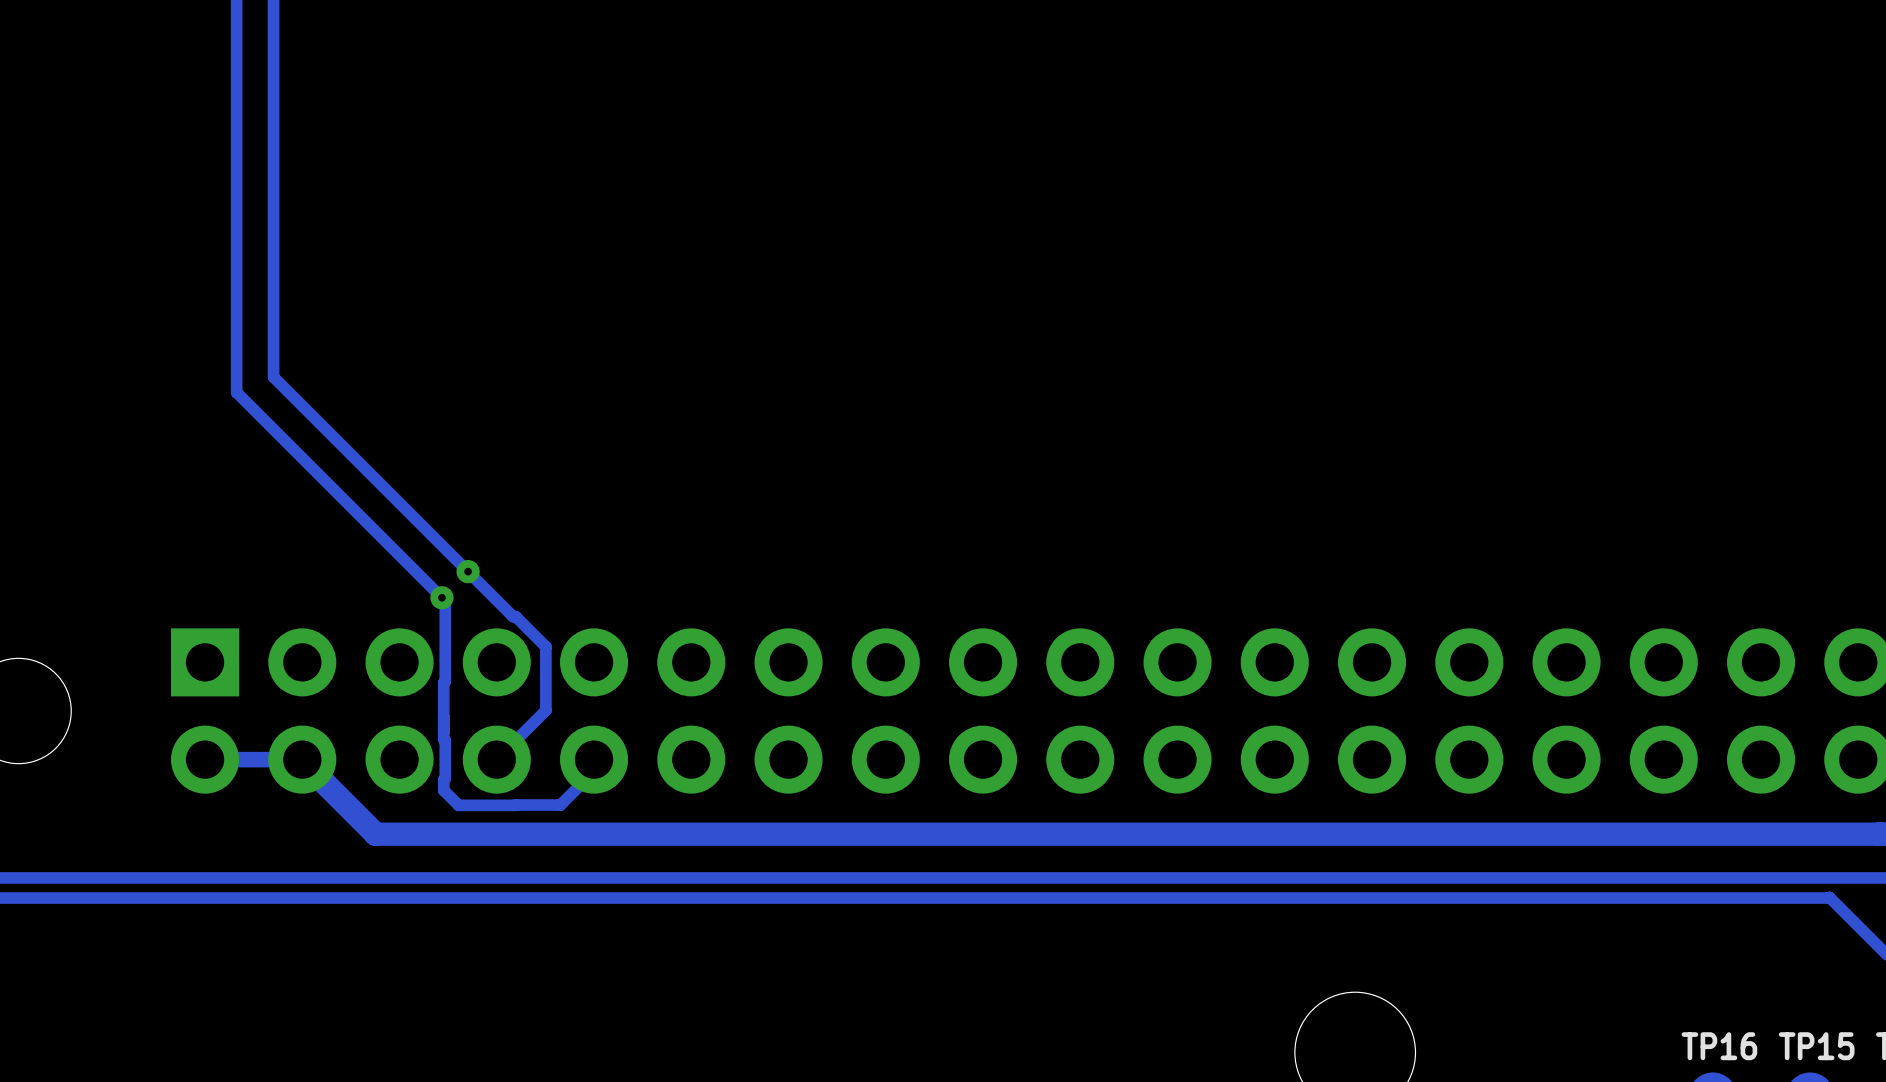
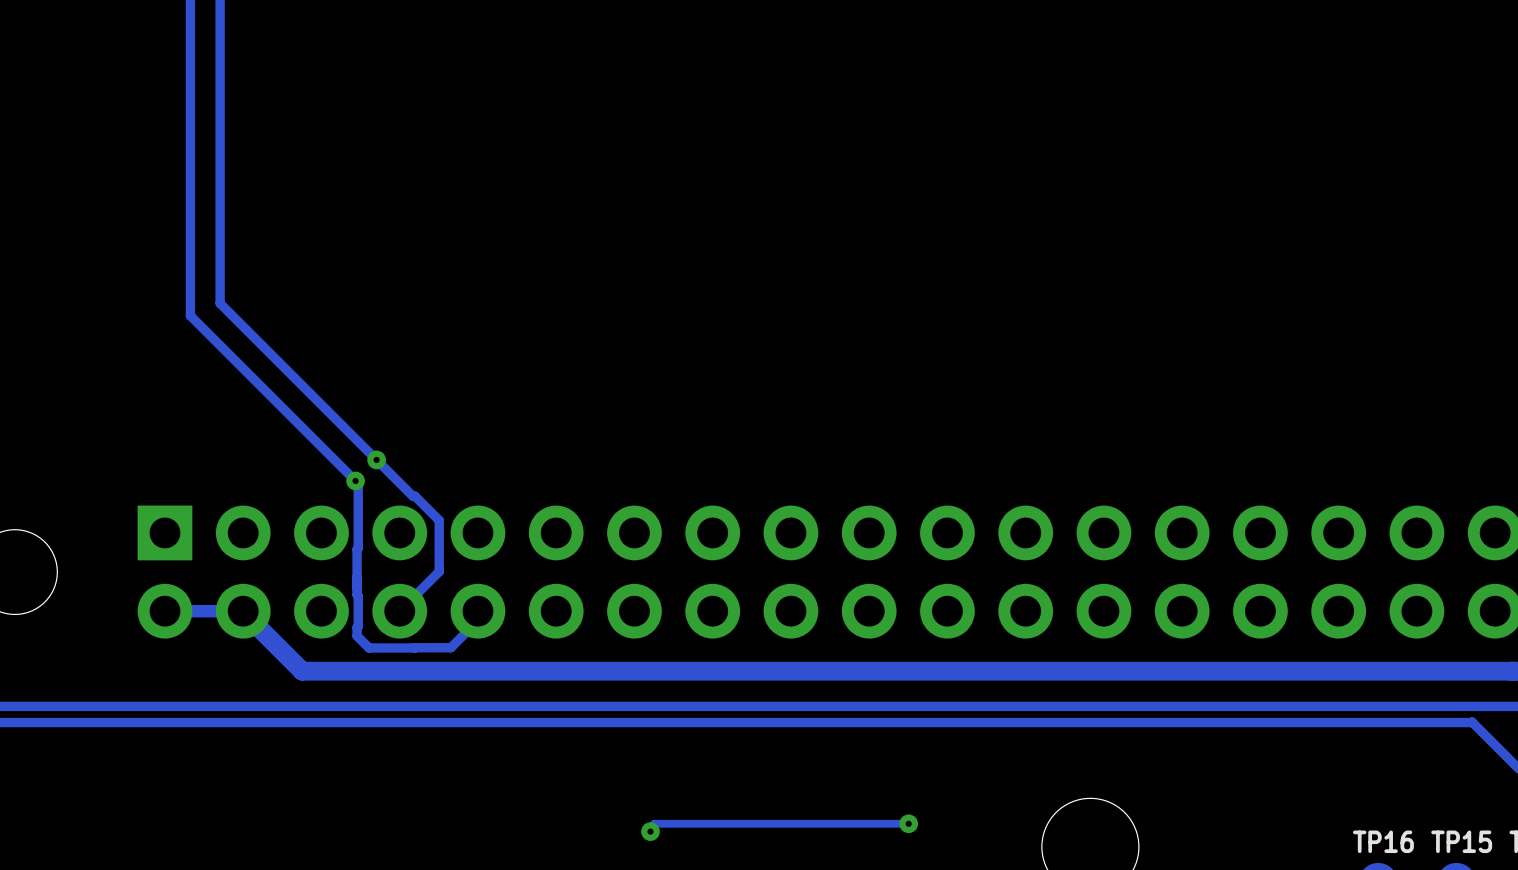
track: none -> (908, 823) (654, 823) (650, 827) (650, 831)
via: none -> (908, 823)
via: none -> (650, 831)

